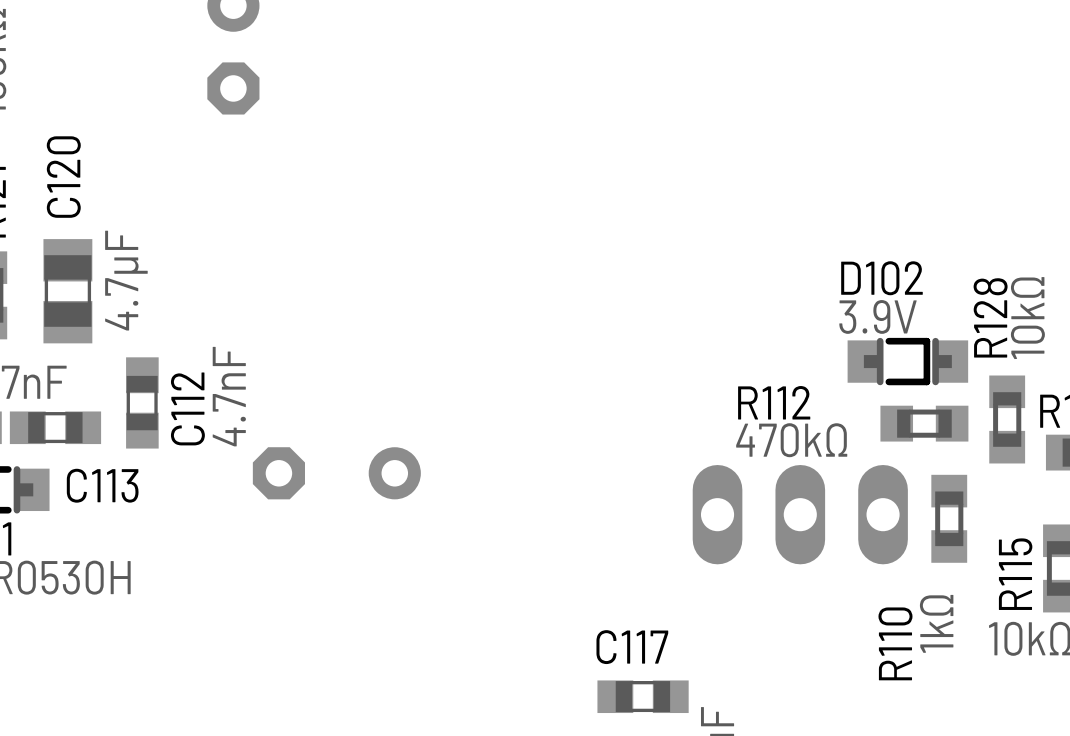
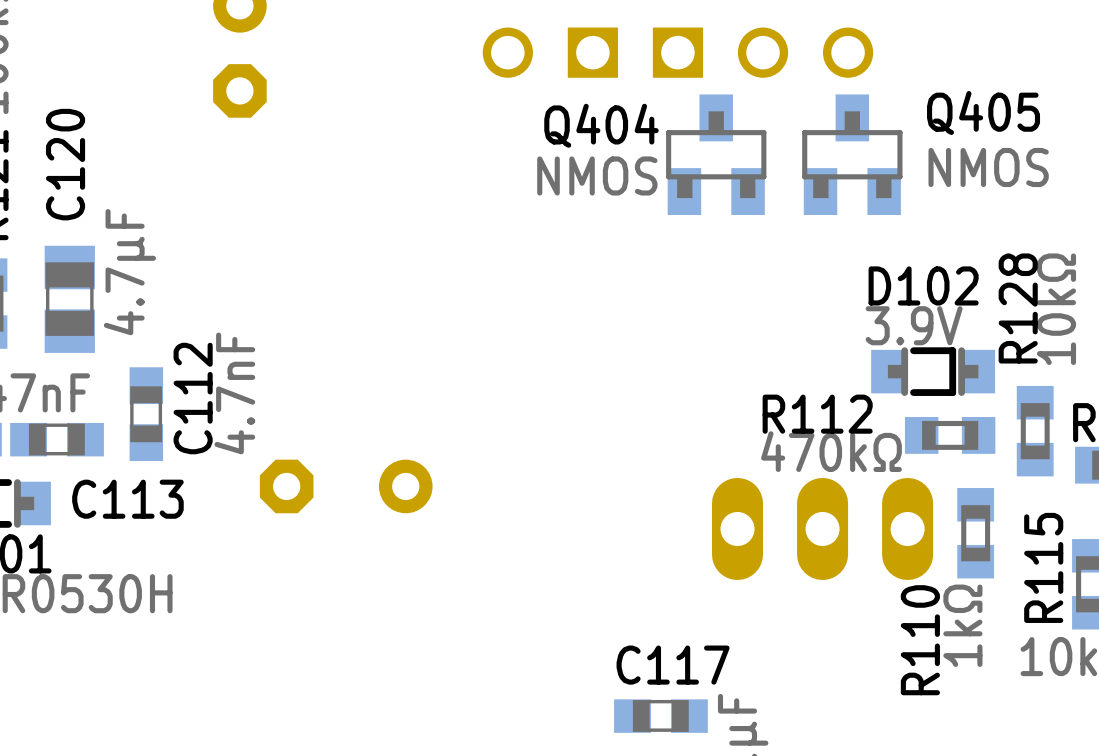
part: none -> (550, 52)
part: none -> (763, 52)
Q404: none -> NMOS (716, 154)
Q405: none -> NMOS (852, 154)

